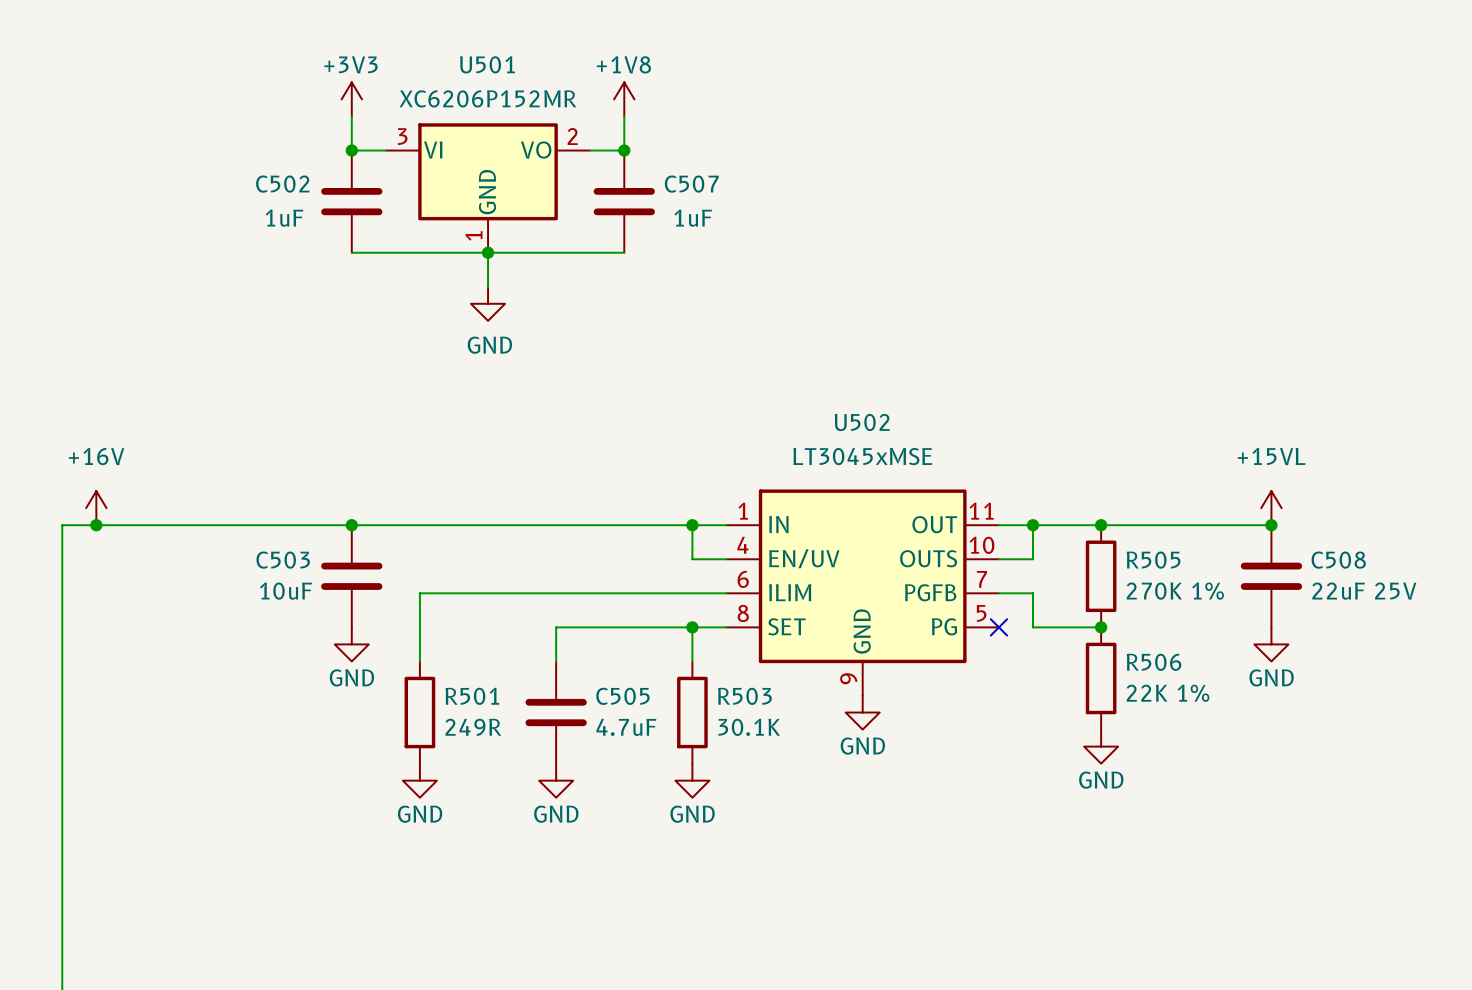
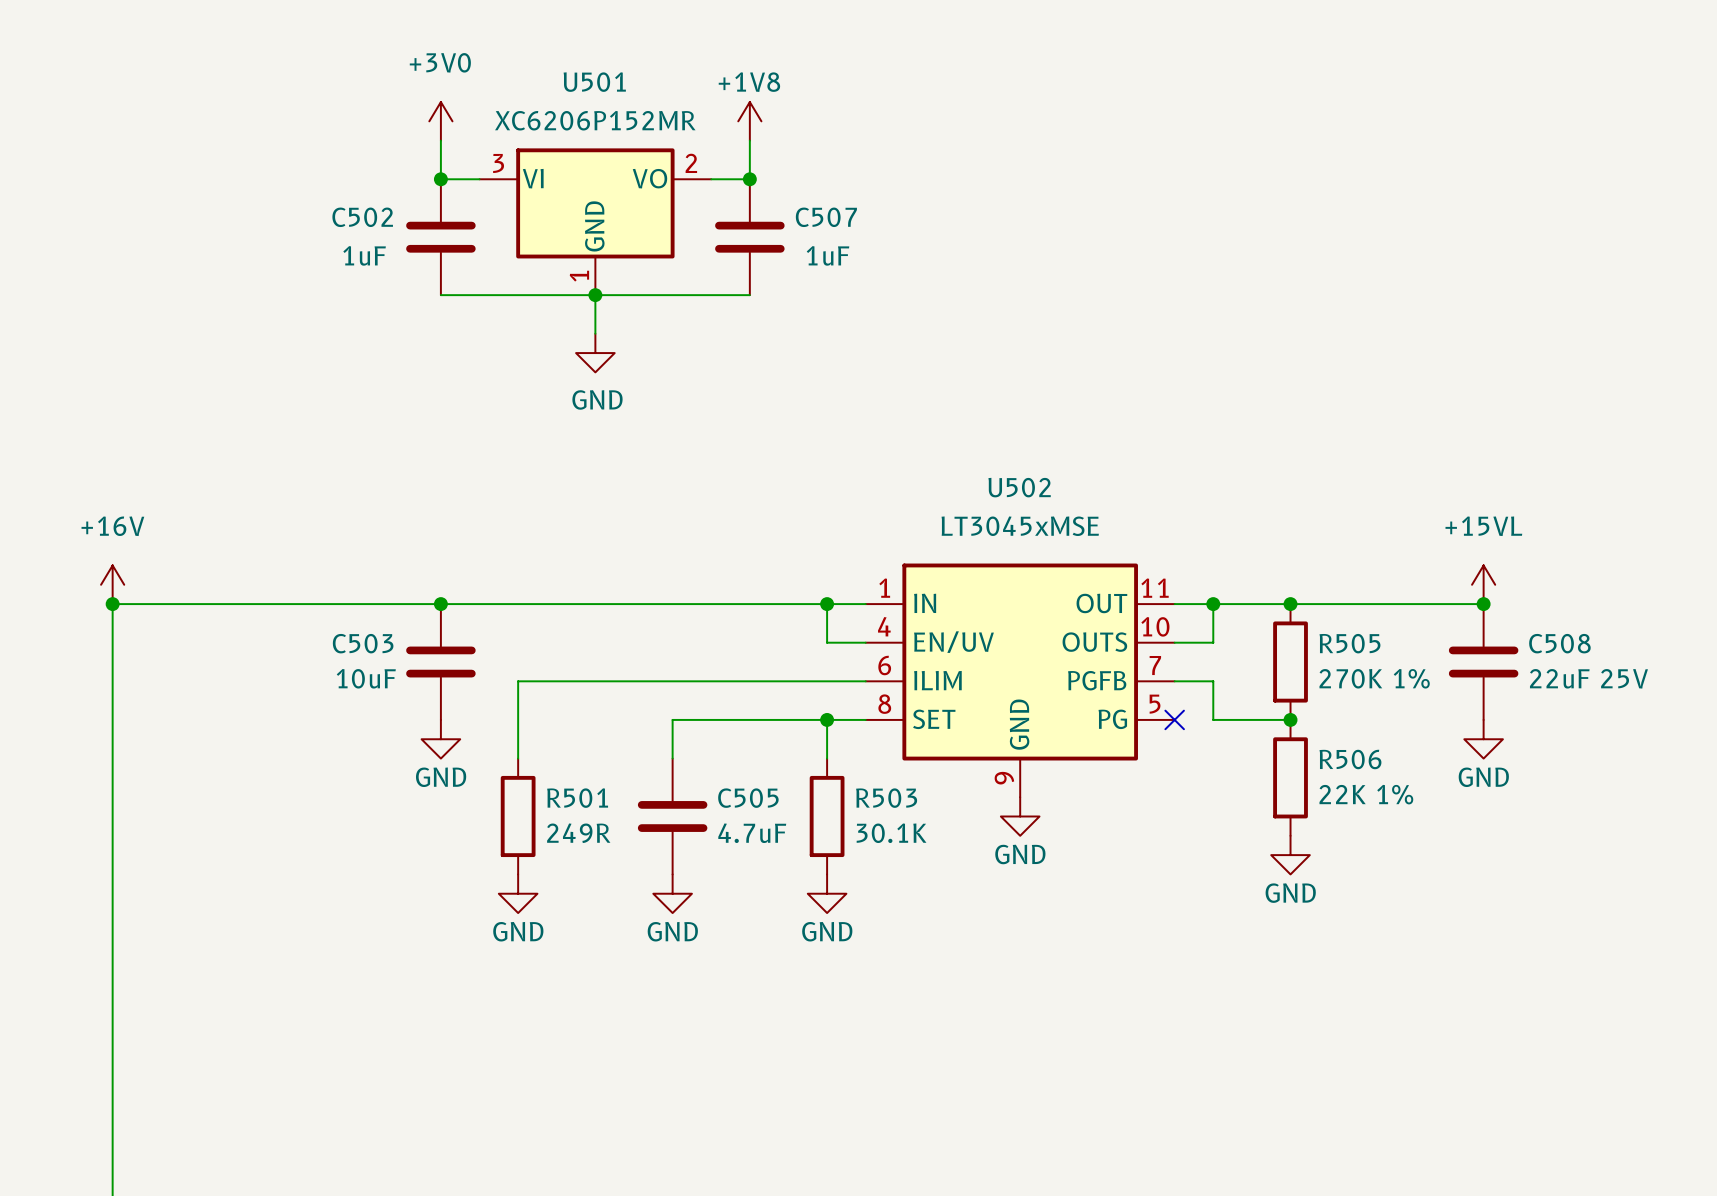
power symbol: +3V3 (351, 99) -> +3V0 (440, 121)
power symbol position: +16V (96, 508) -> +16V (112, 584)
junction position: (96, 525) -> (112, 604)

